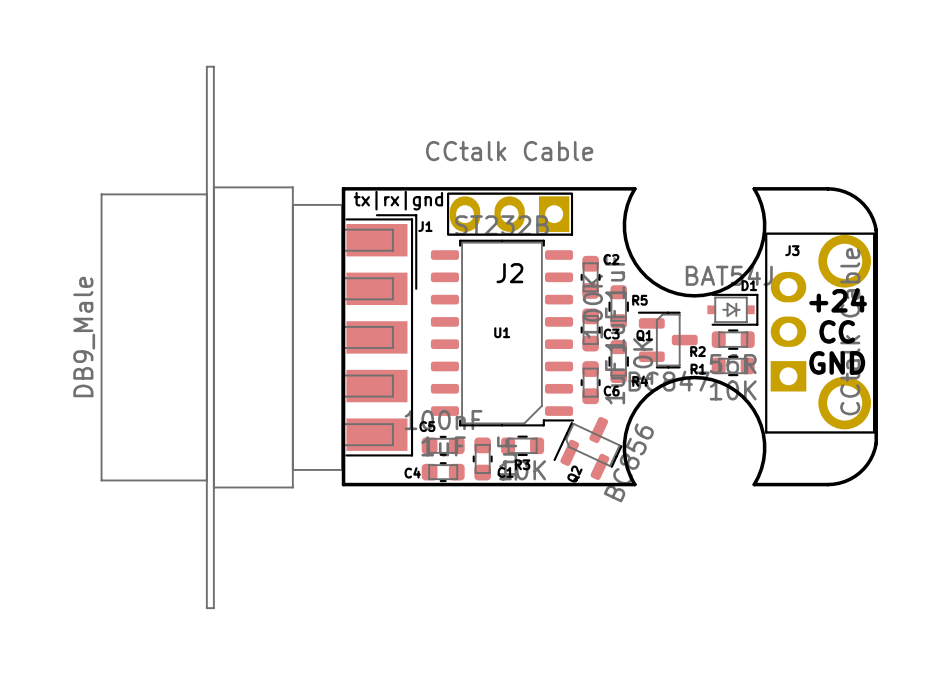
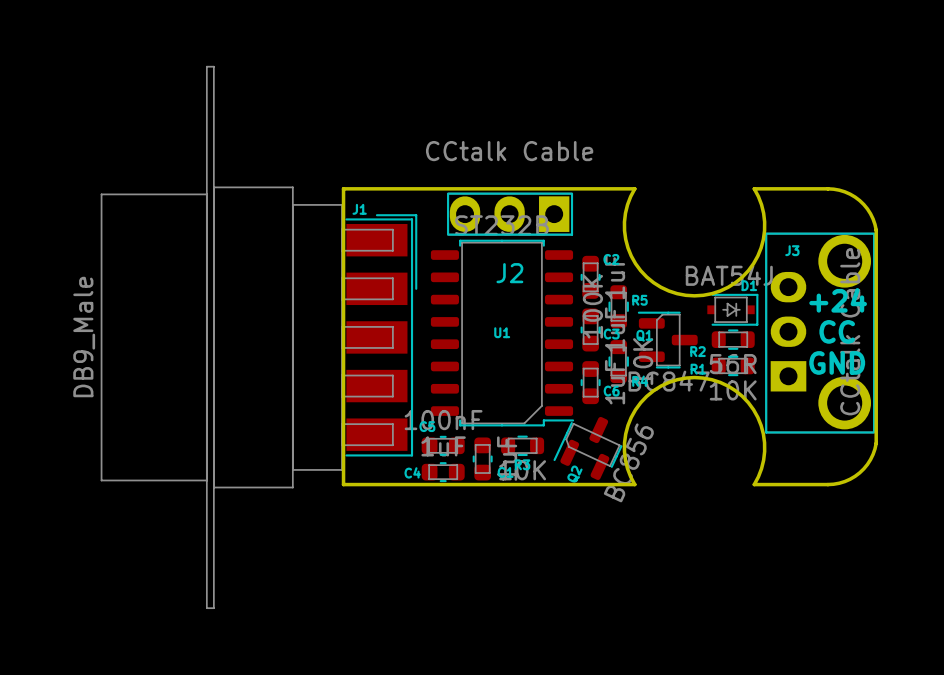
text: tx|rx|gnd (398, 200) -> none
J1 name position: J1 (425, 226) -> J1 (359, 209)

